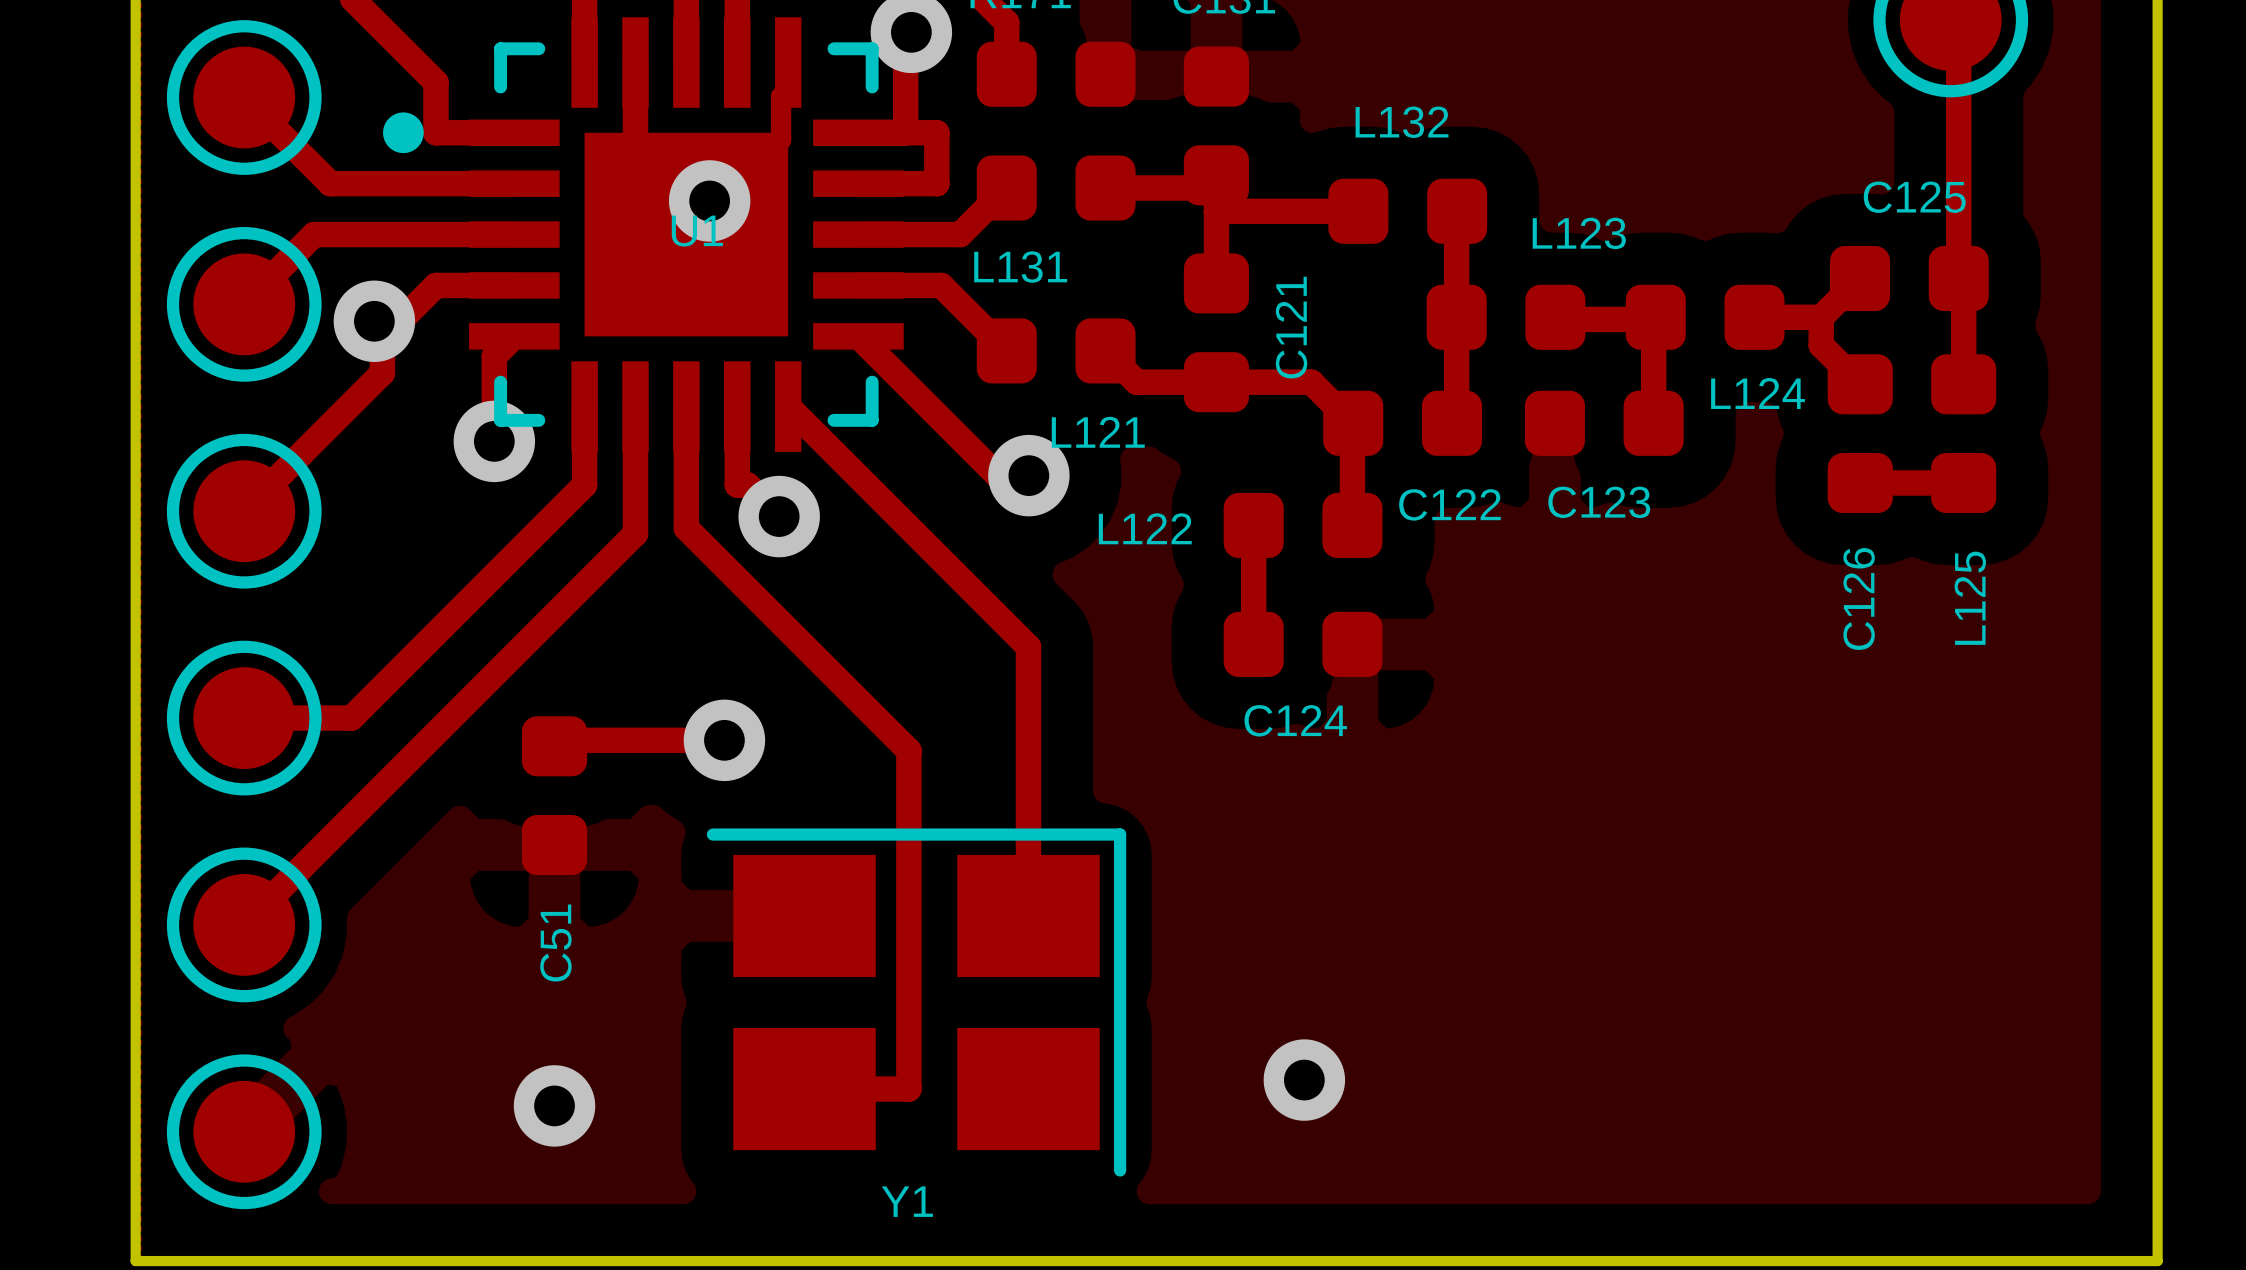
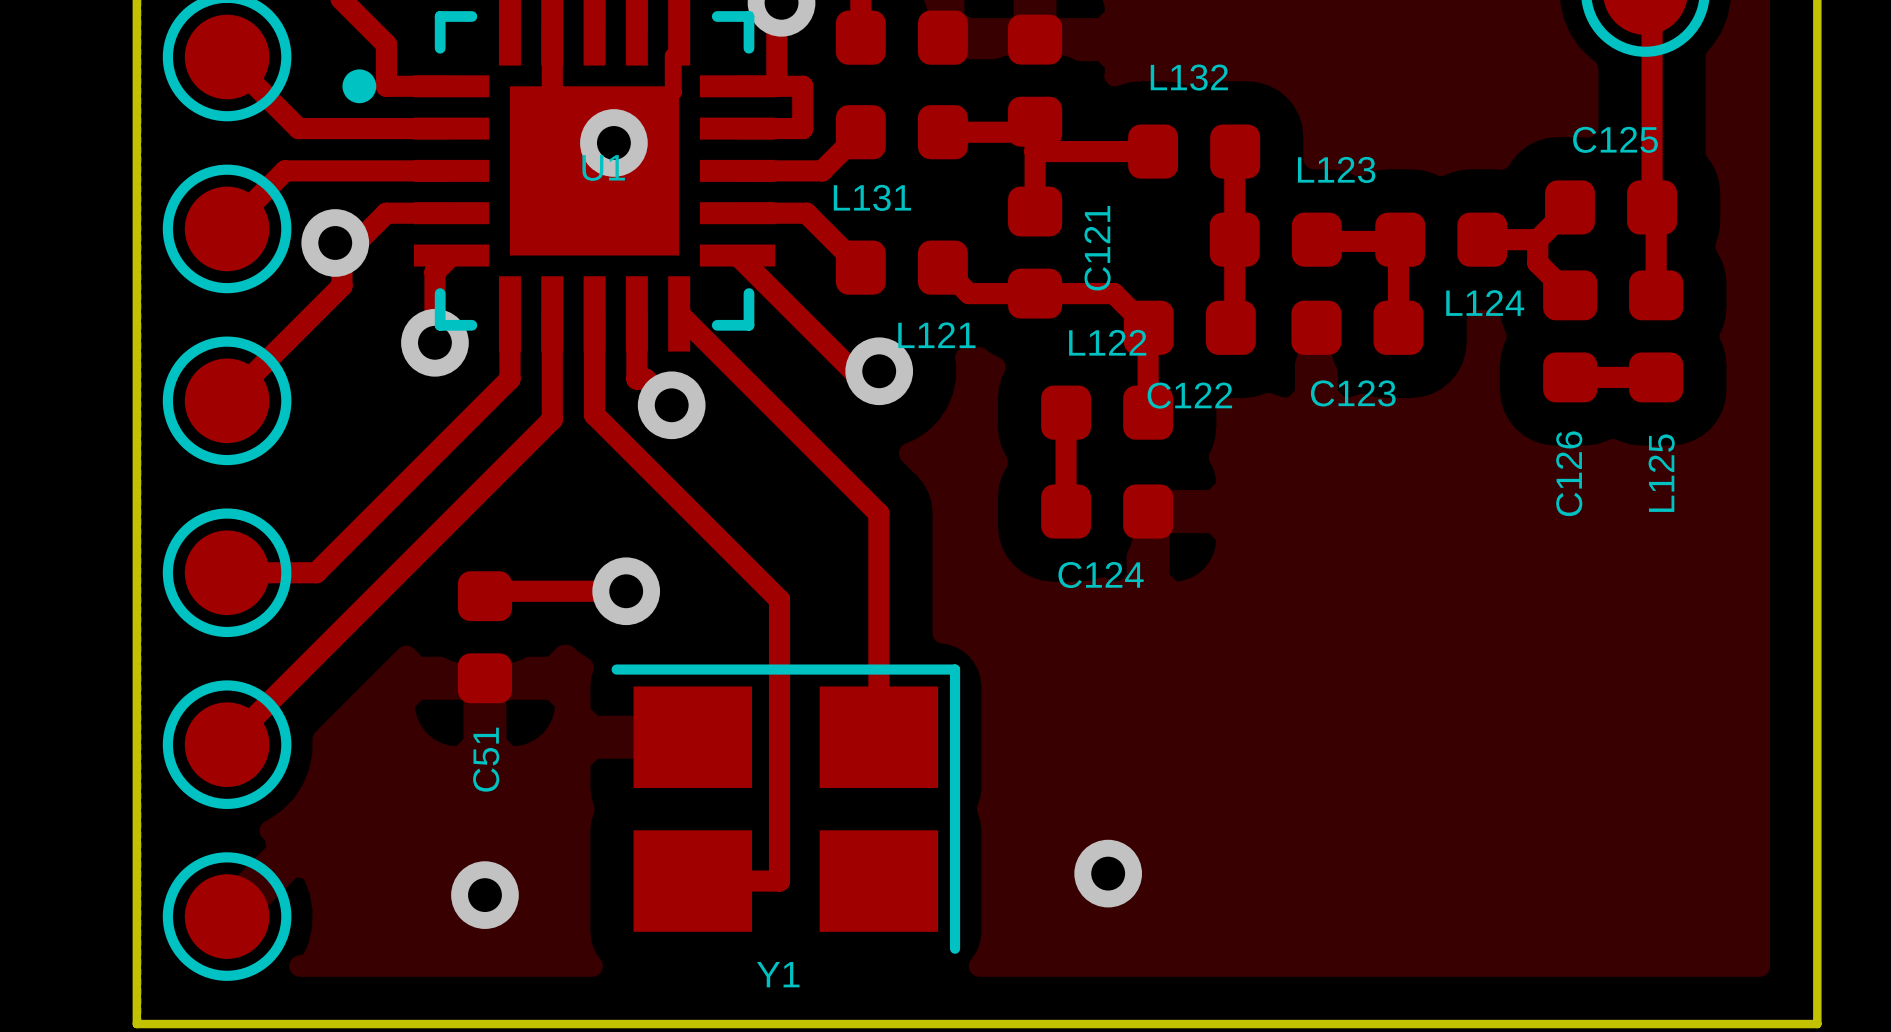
C122 name position: C122 (1449, 504) -> C122 (1189, 395)
L122 name position: L122 (1145, 528) -> L122 (1107, 342)

